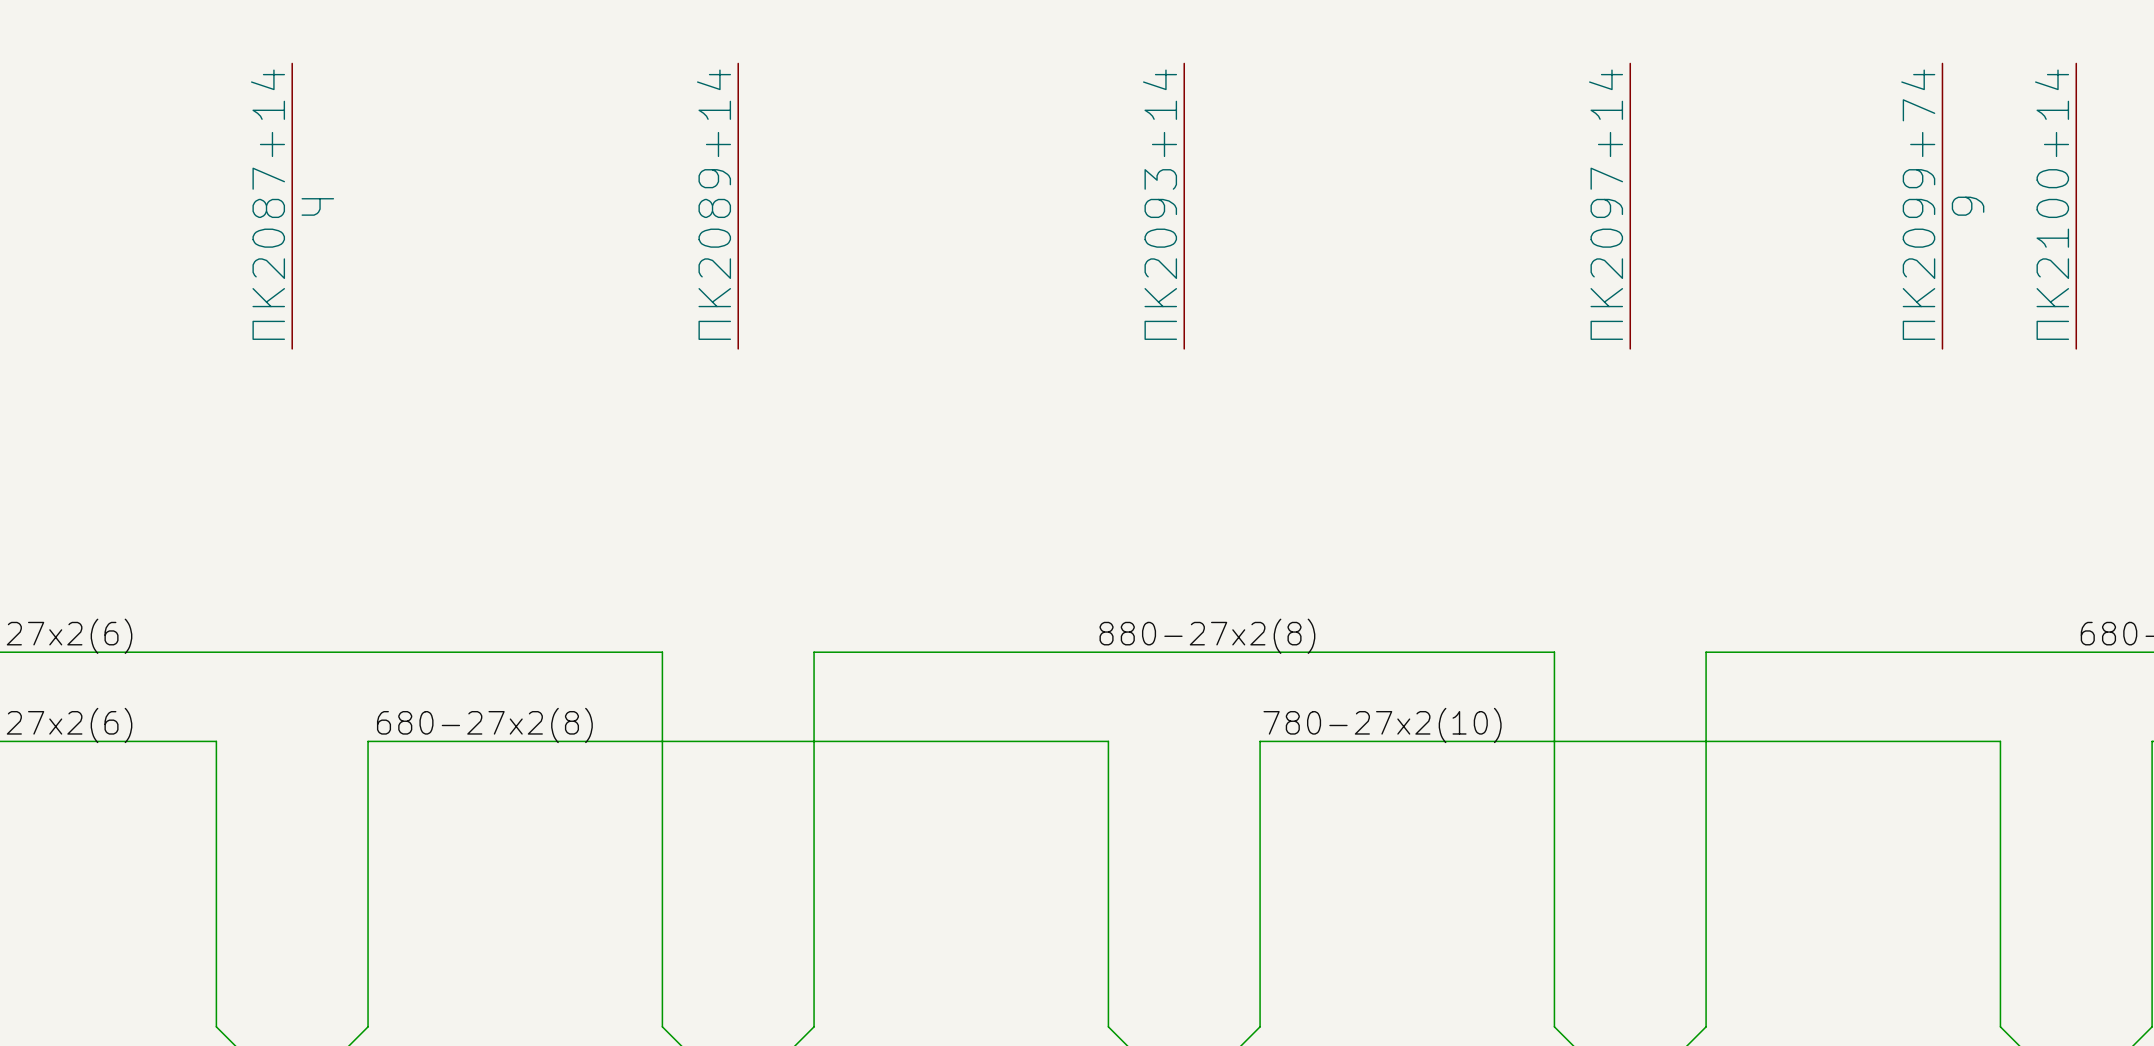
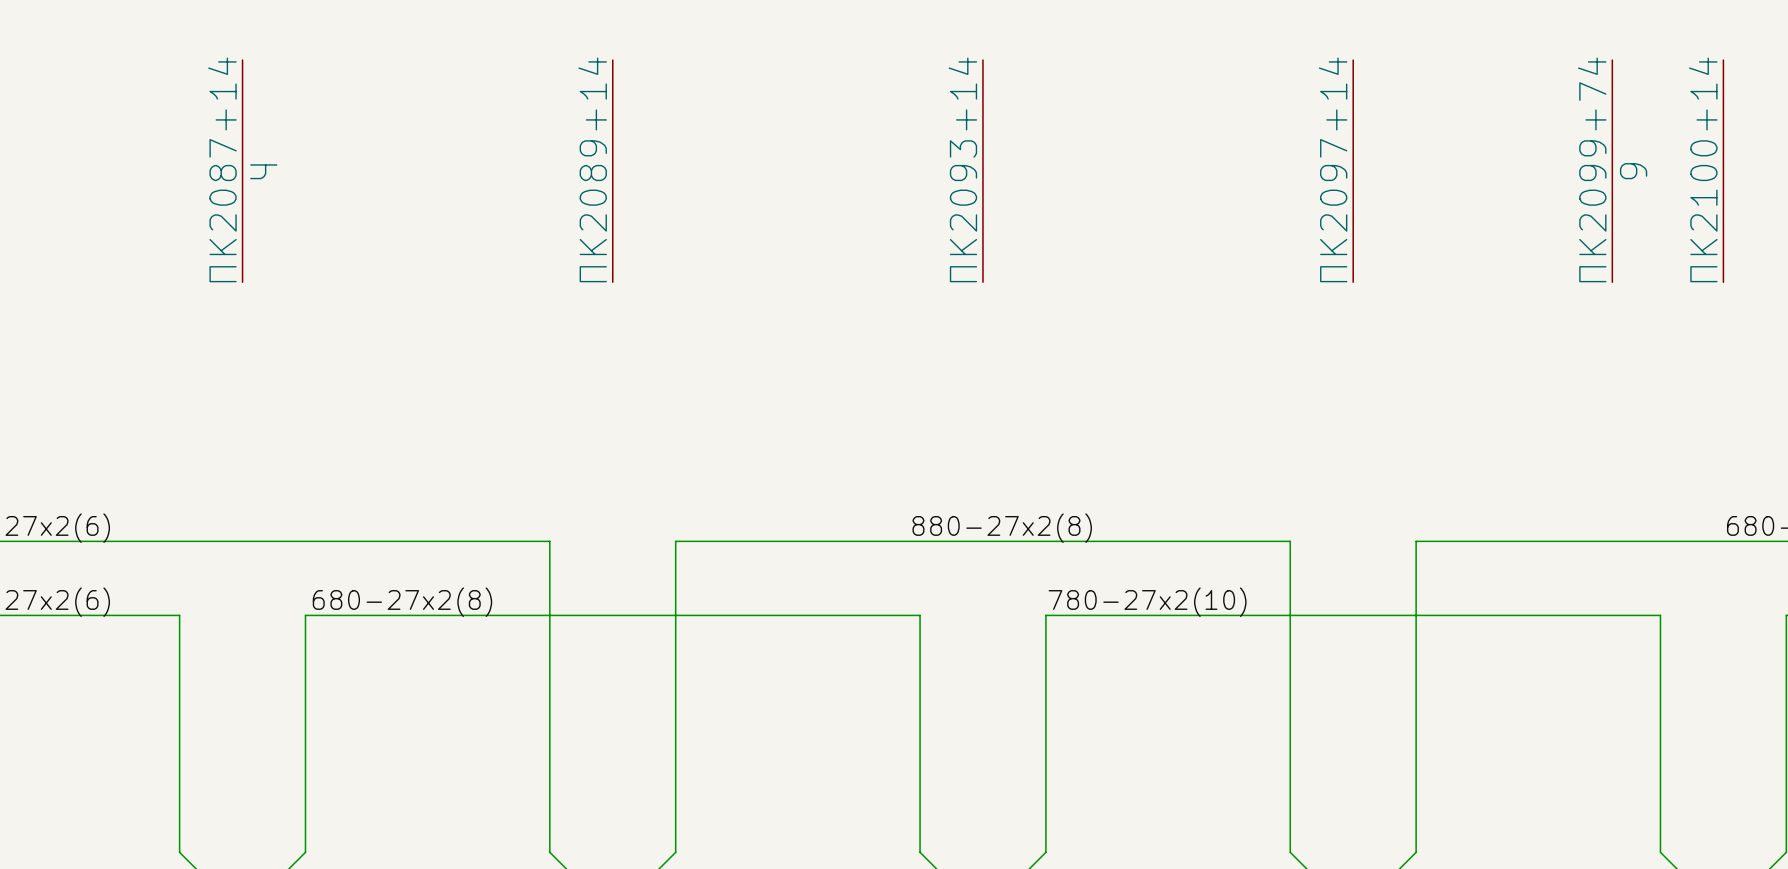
part symbol: [292, 63, 293, 349] -> [242, 60, 243, 283]
part symbol: [738, 63, 739, 349] -> [612, 60, 613, 283]
part symbol: [1184, 63, 1185, 349] -> [982, 60, 983, 283]
part symbol: [1630, 63, 1631, 349] -> [1353, 60, 1354, 283]
part symbol: [1942, 63, 1943, 349] -> [1612, 60, 1613, 283]
part symbol: [2076, 63, 2077, 349] -> [1723, 60, 1724, 283]

